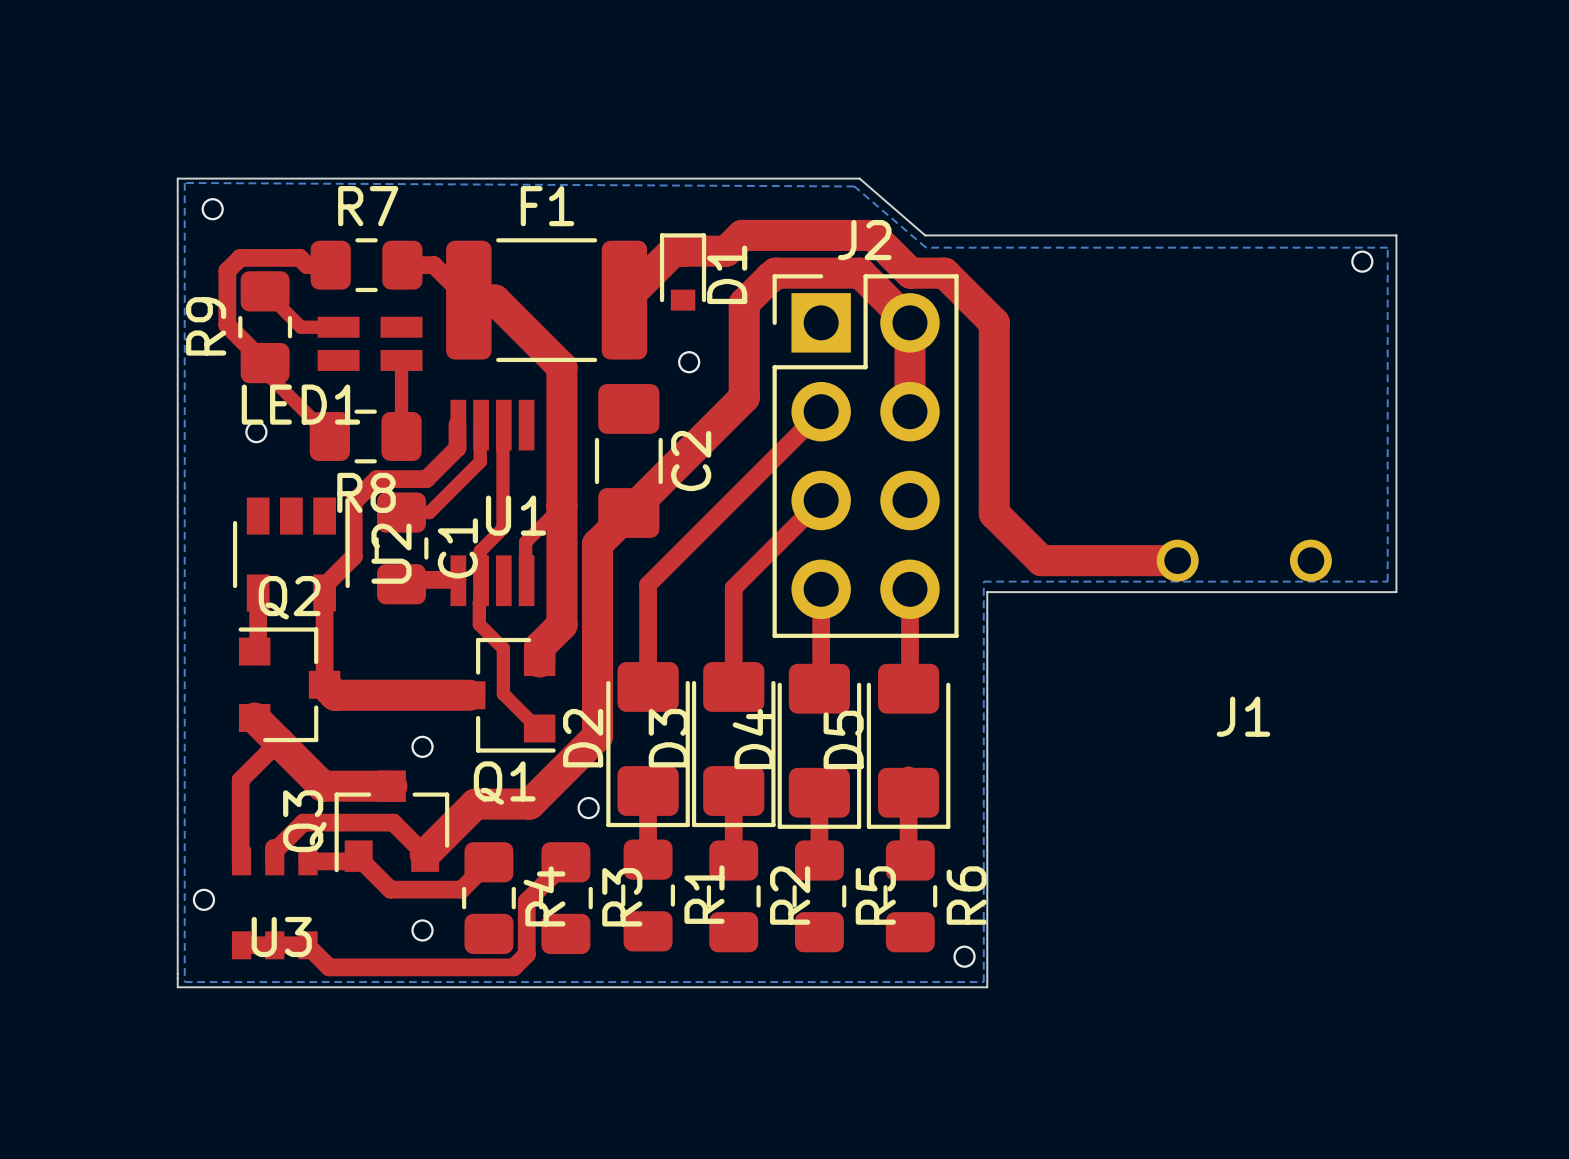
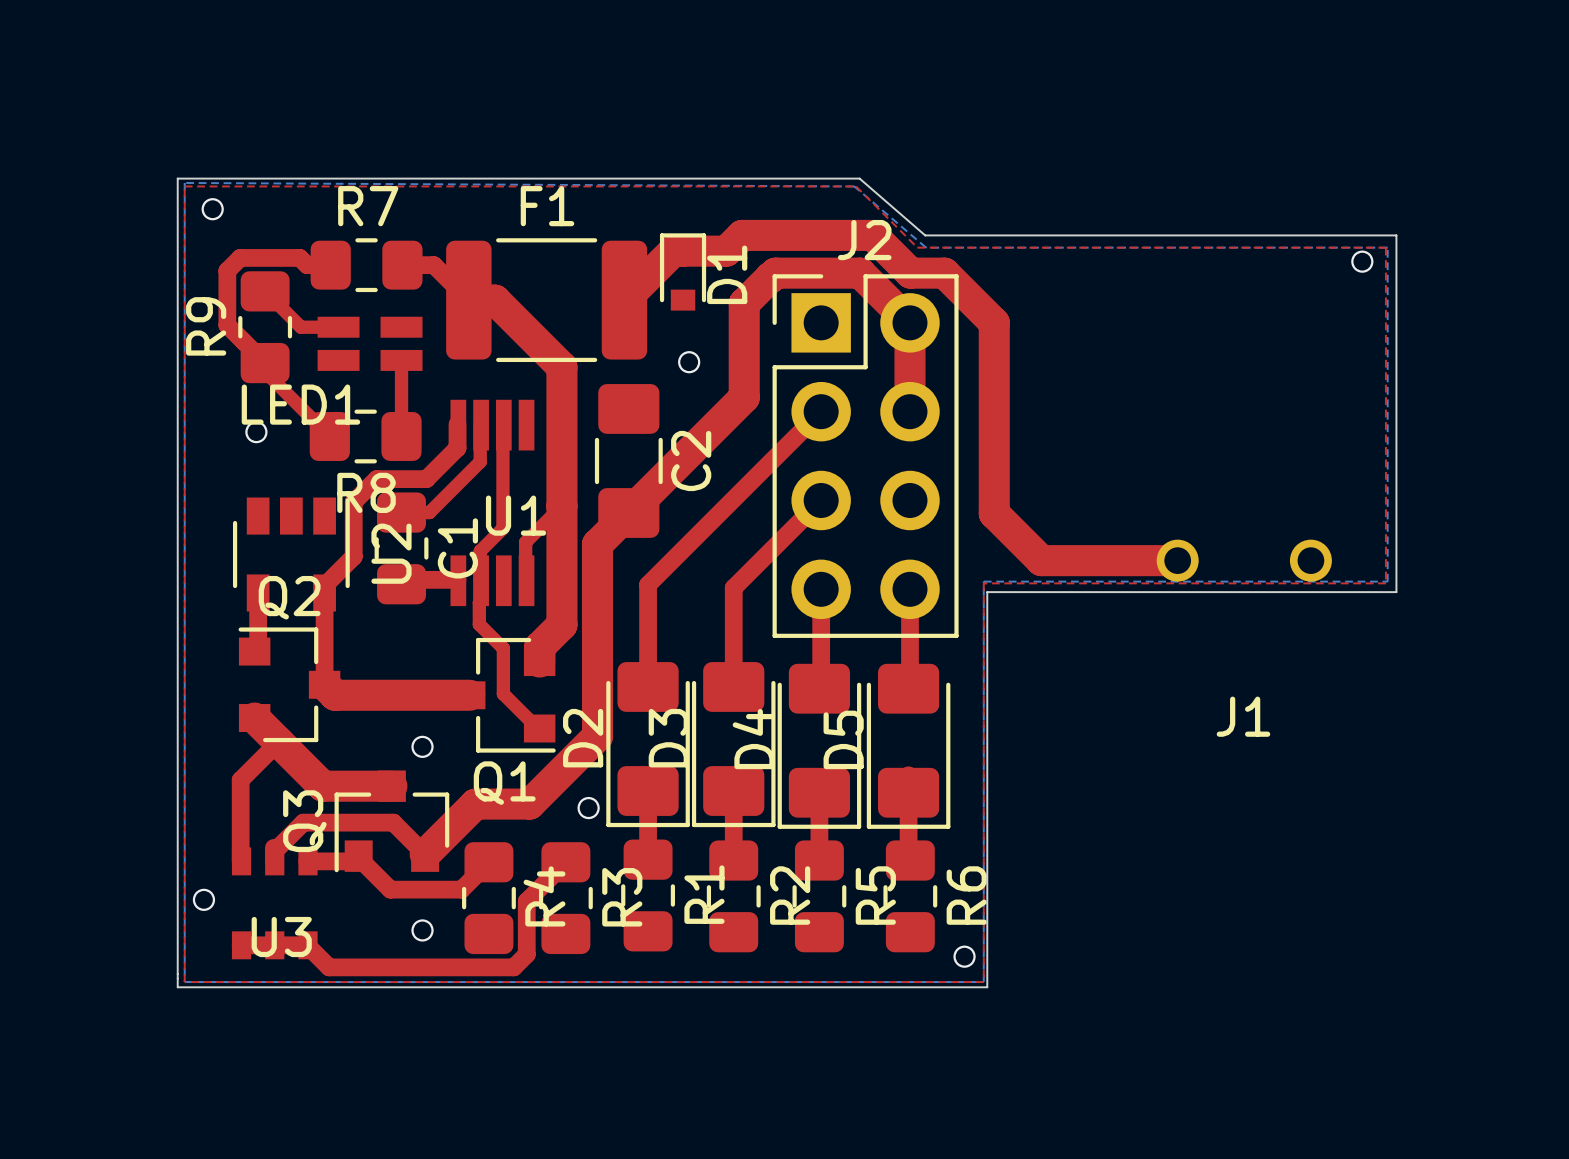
top zone outline: none -> (184, 186) (856, 186) (917, 247) (1385, 247) (1385, 583) (983, 583) (983, 982) (184, 982) (184, 186)

